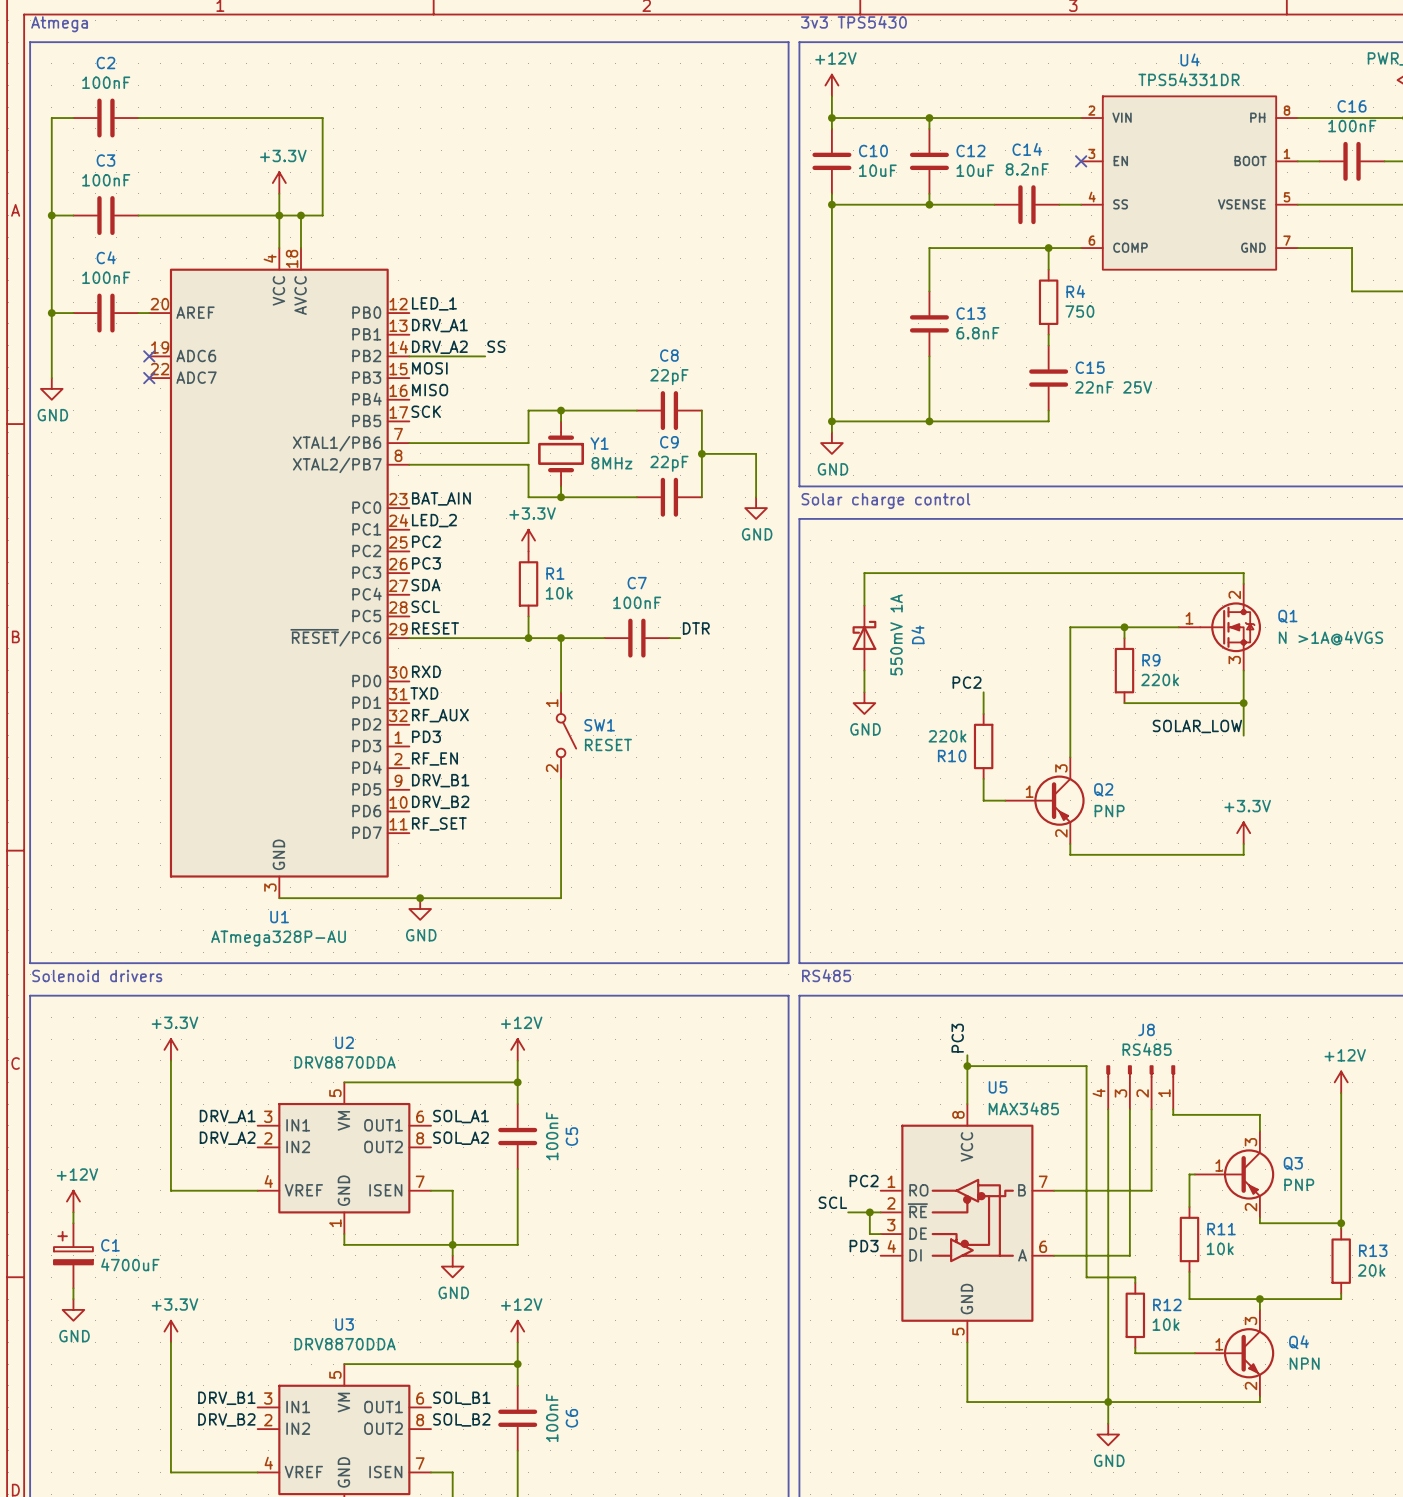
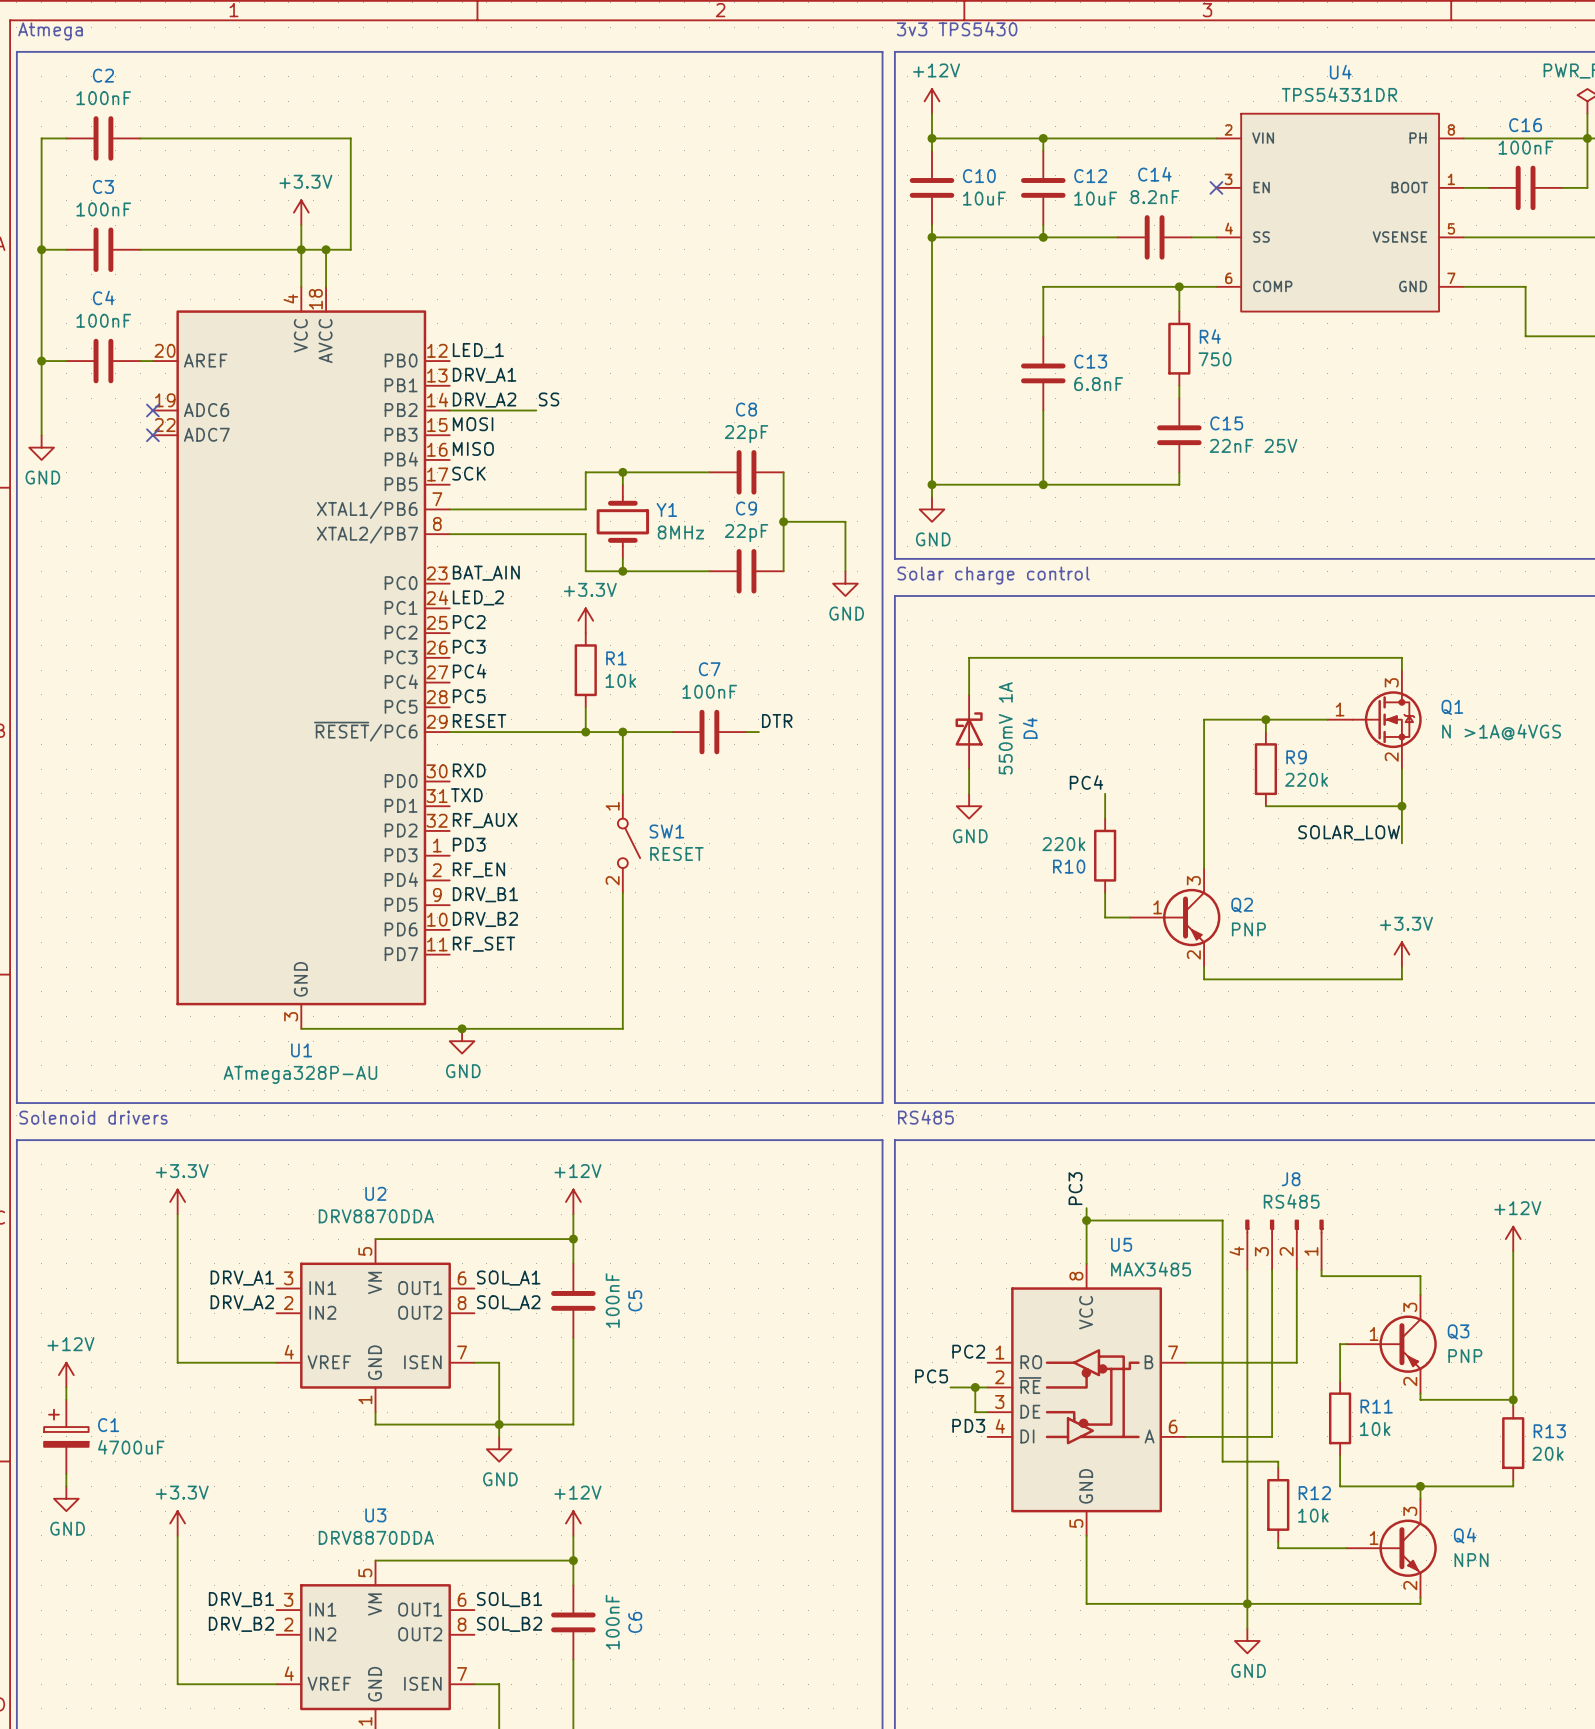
label: SDA (425, 585) -> PC4 (469, 671)
Q1 pin number: 2 (1234, 595) -> 3 (1391, 682)
label: SCL (425, 606) -> PC5 (469, 696)
Q1 pin number: 3 (1234, 660) -> 2 (1391, 757)
label: PC2 (967, 682) -> PC4 (1086, 782)
label: SCL (832, 1202) -> PC5 (931, 1376)

